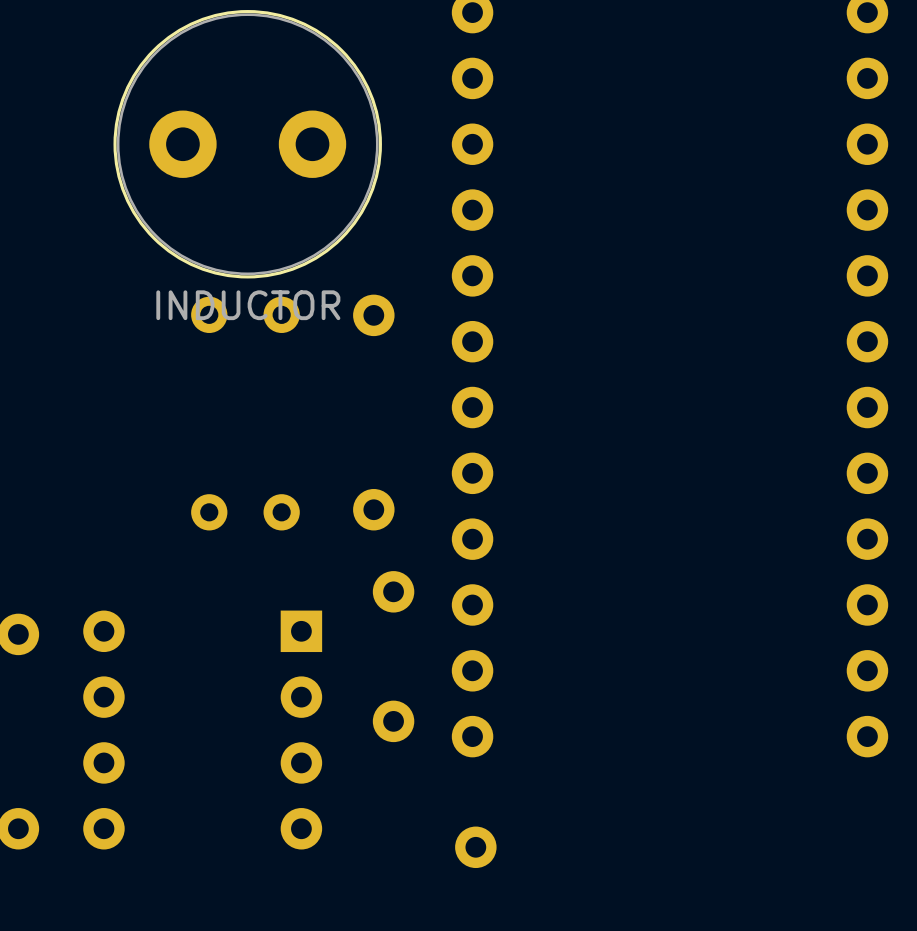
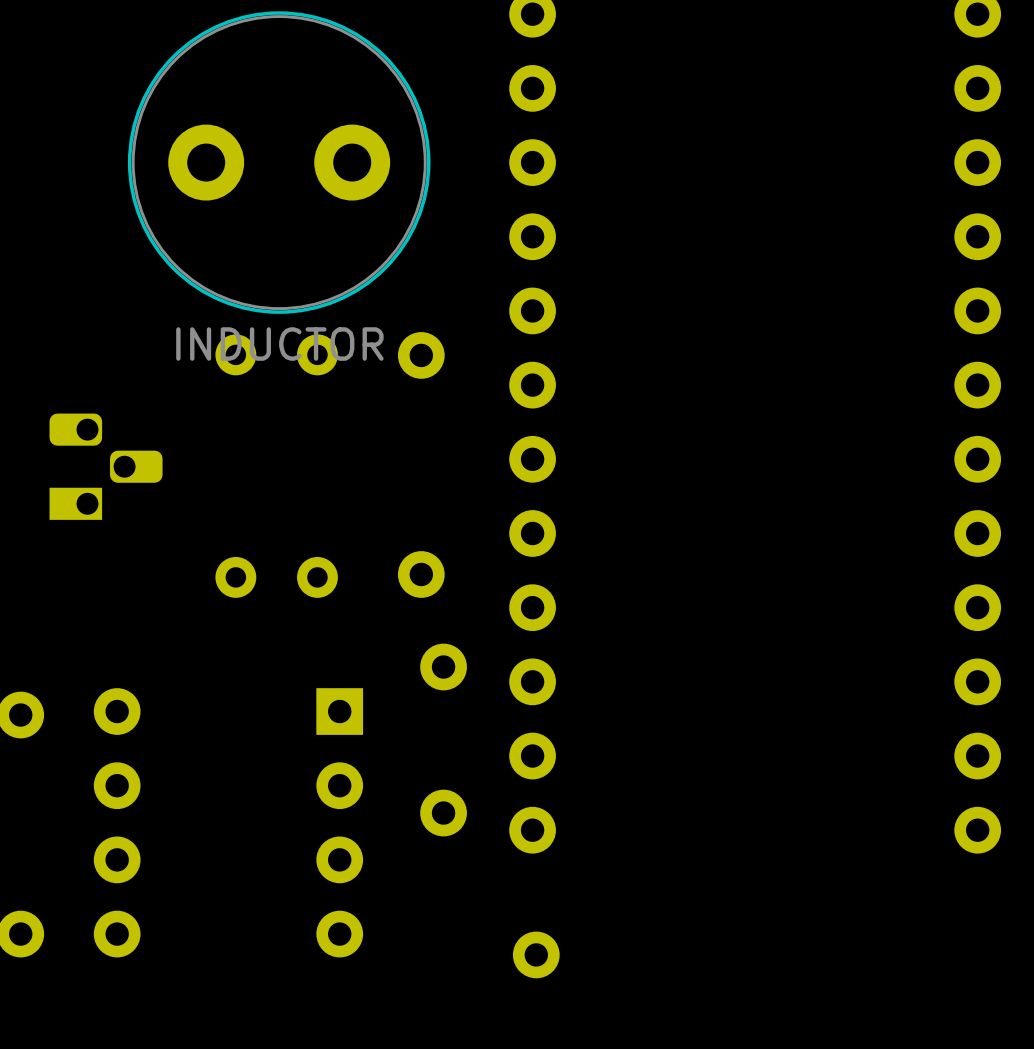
part: none -> (106, 466)

